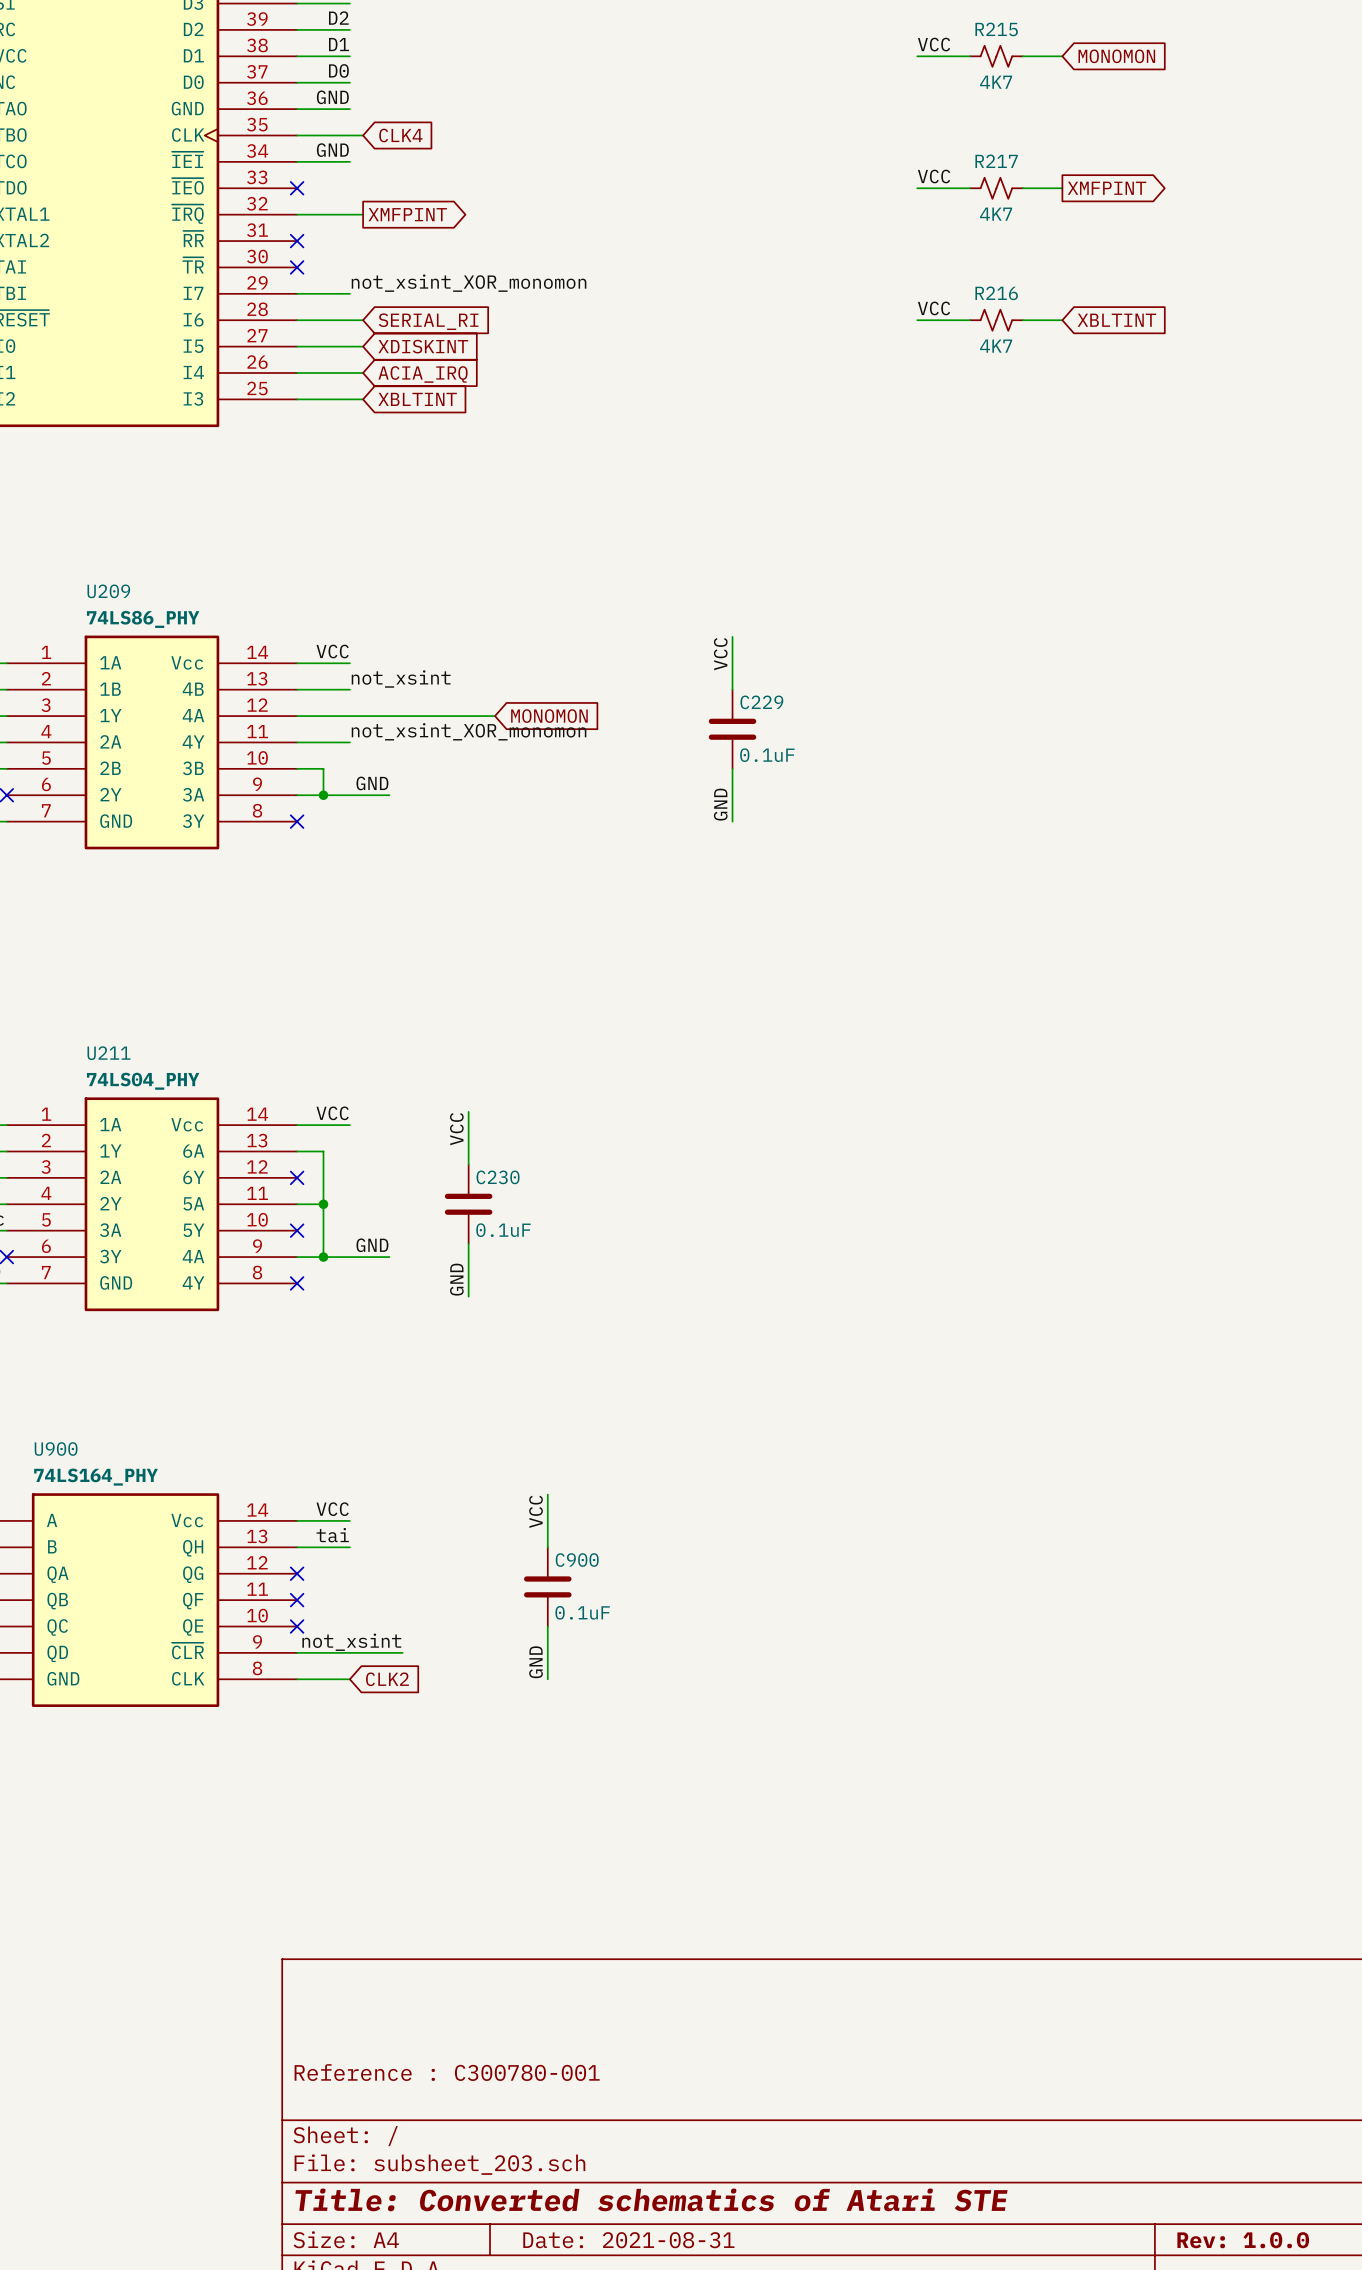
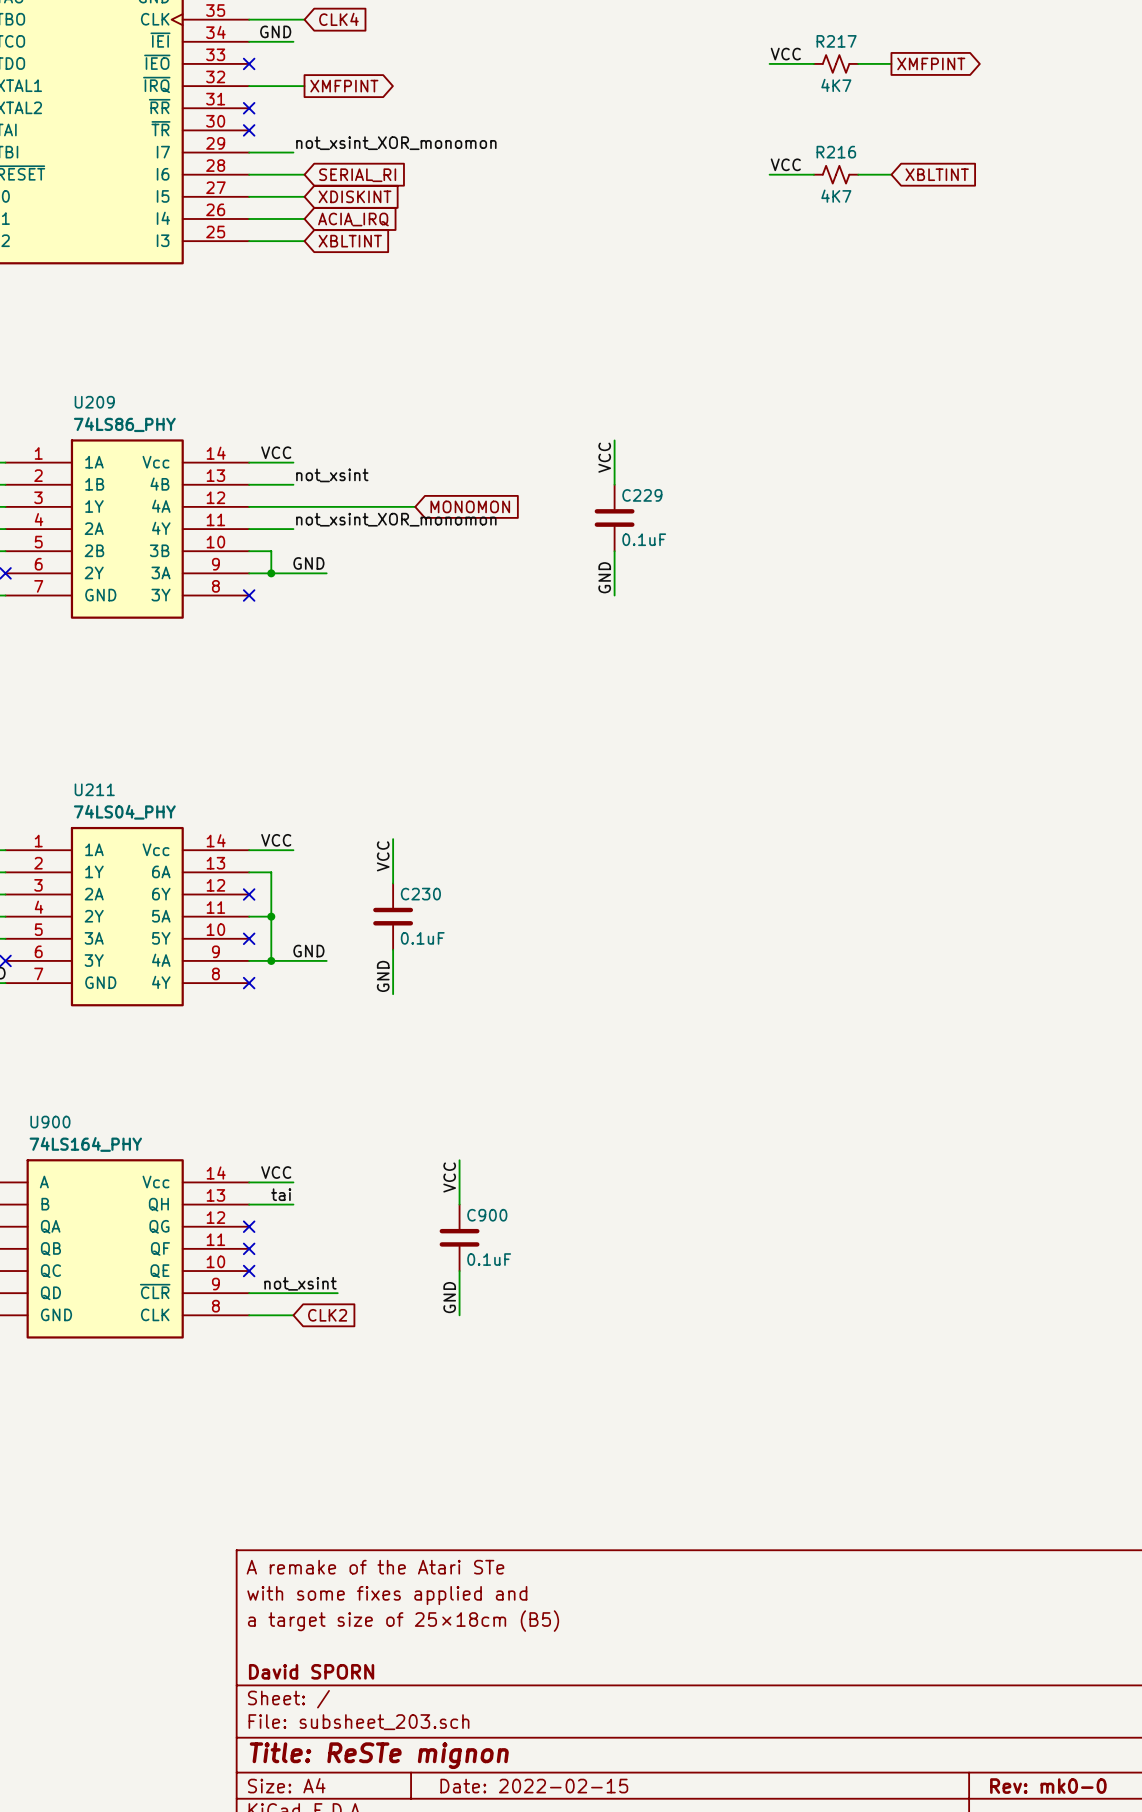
title block: none -> A remake of the Atari STe (375, 1567)
title block: none -> with some fixes applied and (387, 1595)
title block: none -> a target size of 25×18cm (B5) (403, 1621)
title block: Reference : C300780-001 (447, 2072) -> none
title block: none -> David SPORN (311, 1671)
title block: Title: Converted schematics of Atari STE (651, 2199) -> Title: ReSTe mignon (379, 1755)
title block: Date: 2021-08-31 (628, 2240) -> Date: 2022-02-15 (534, 1786)
title block: Rev: 1.0.0 (1243, 2240) -> Rev: mk0-0 (1048, 1786)

